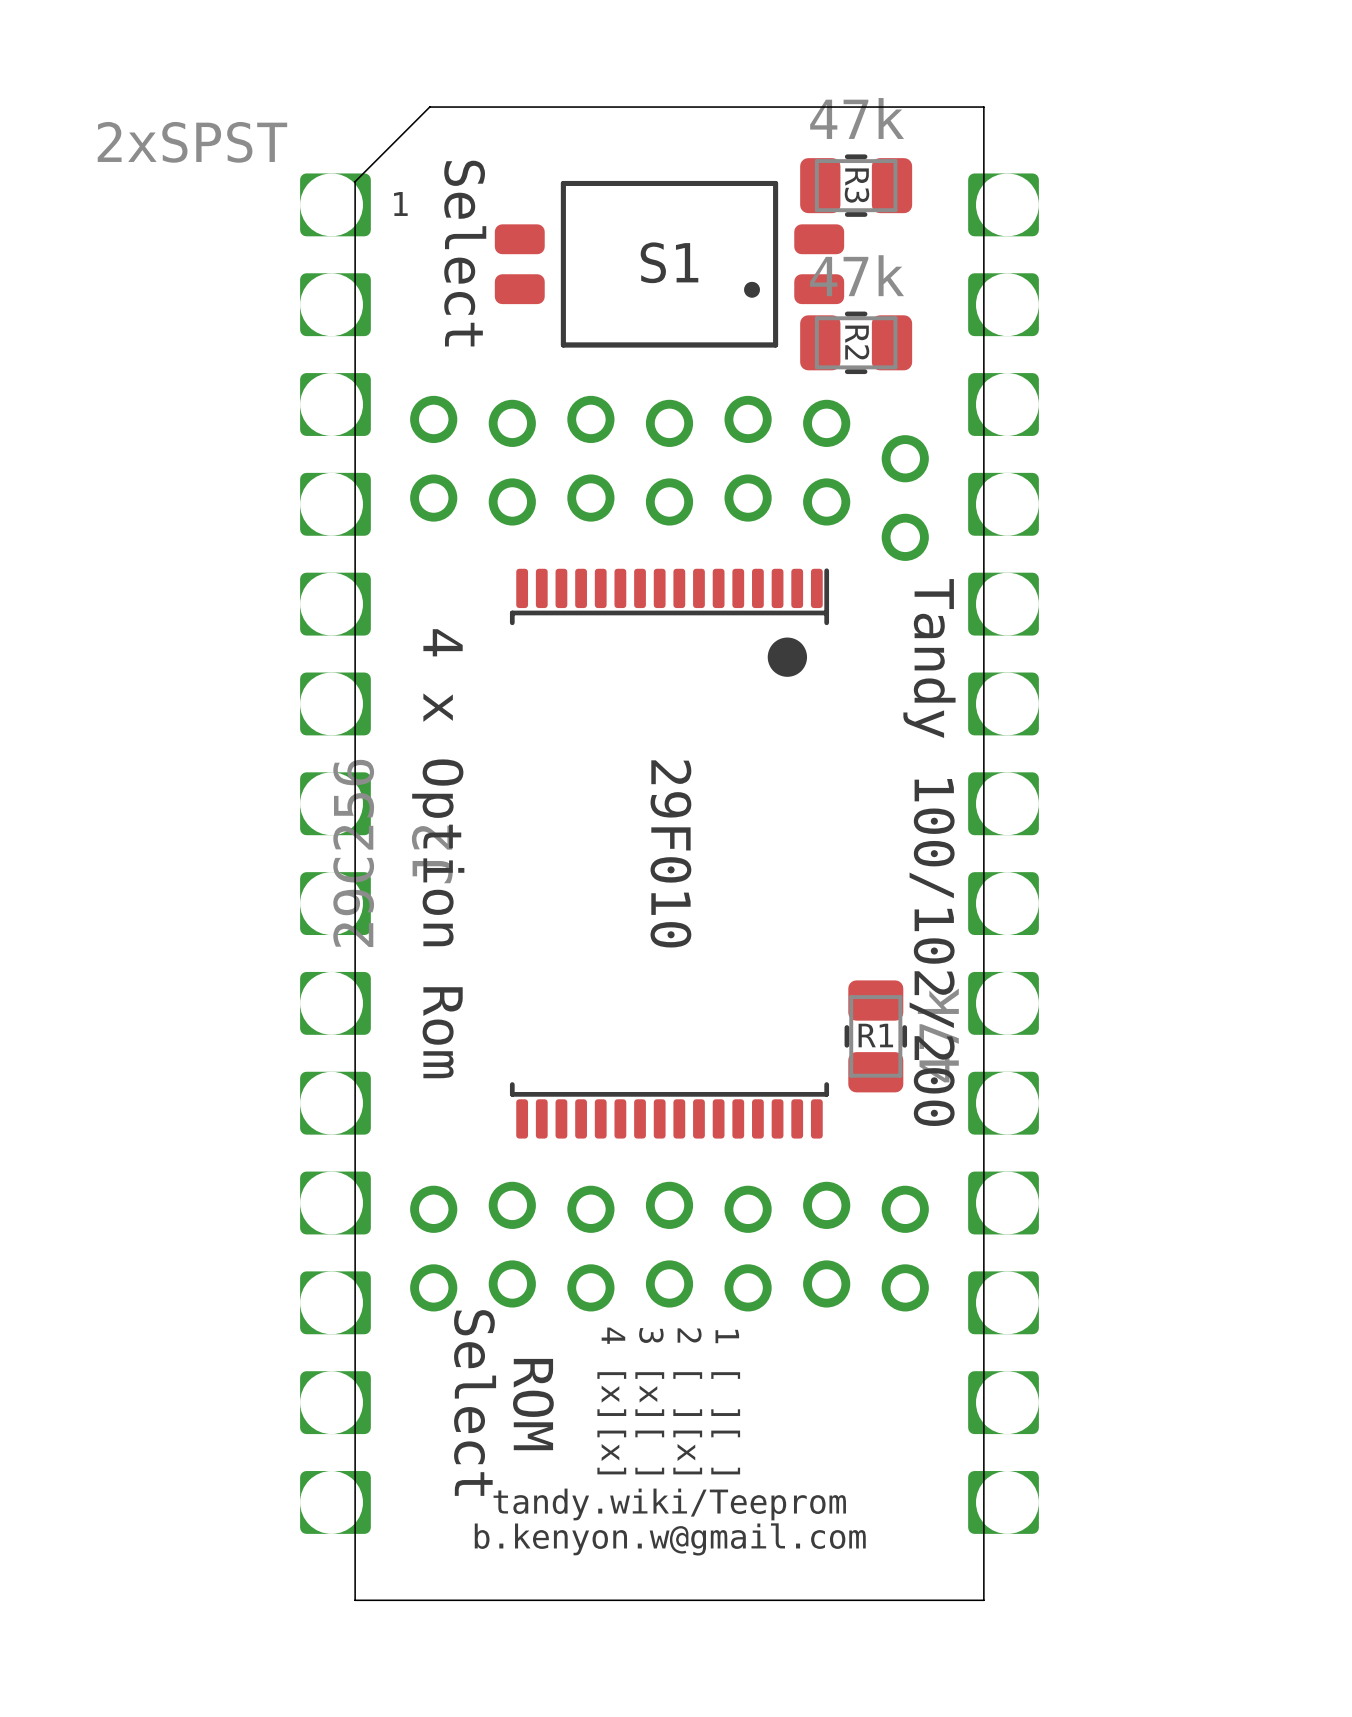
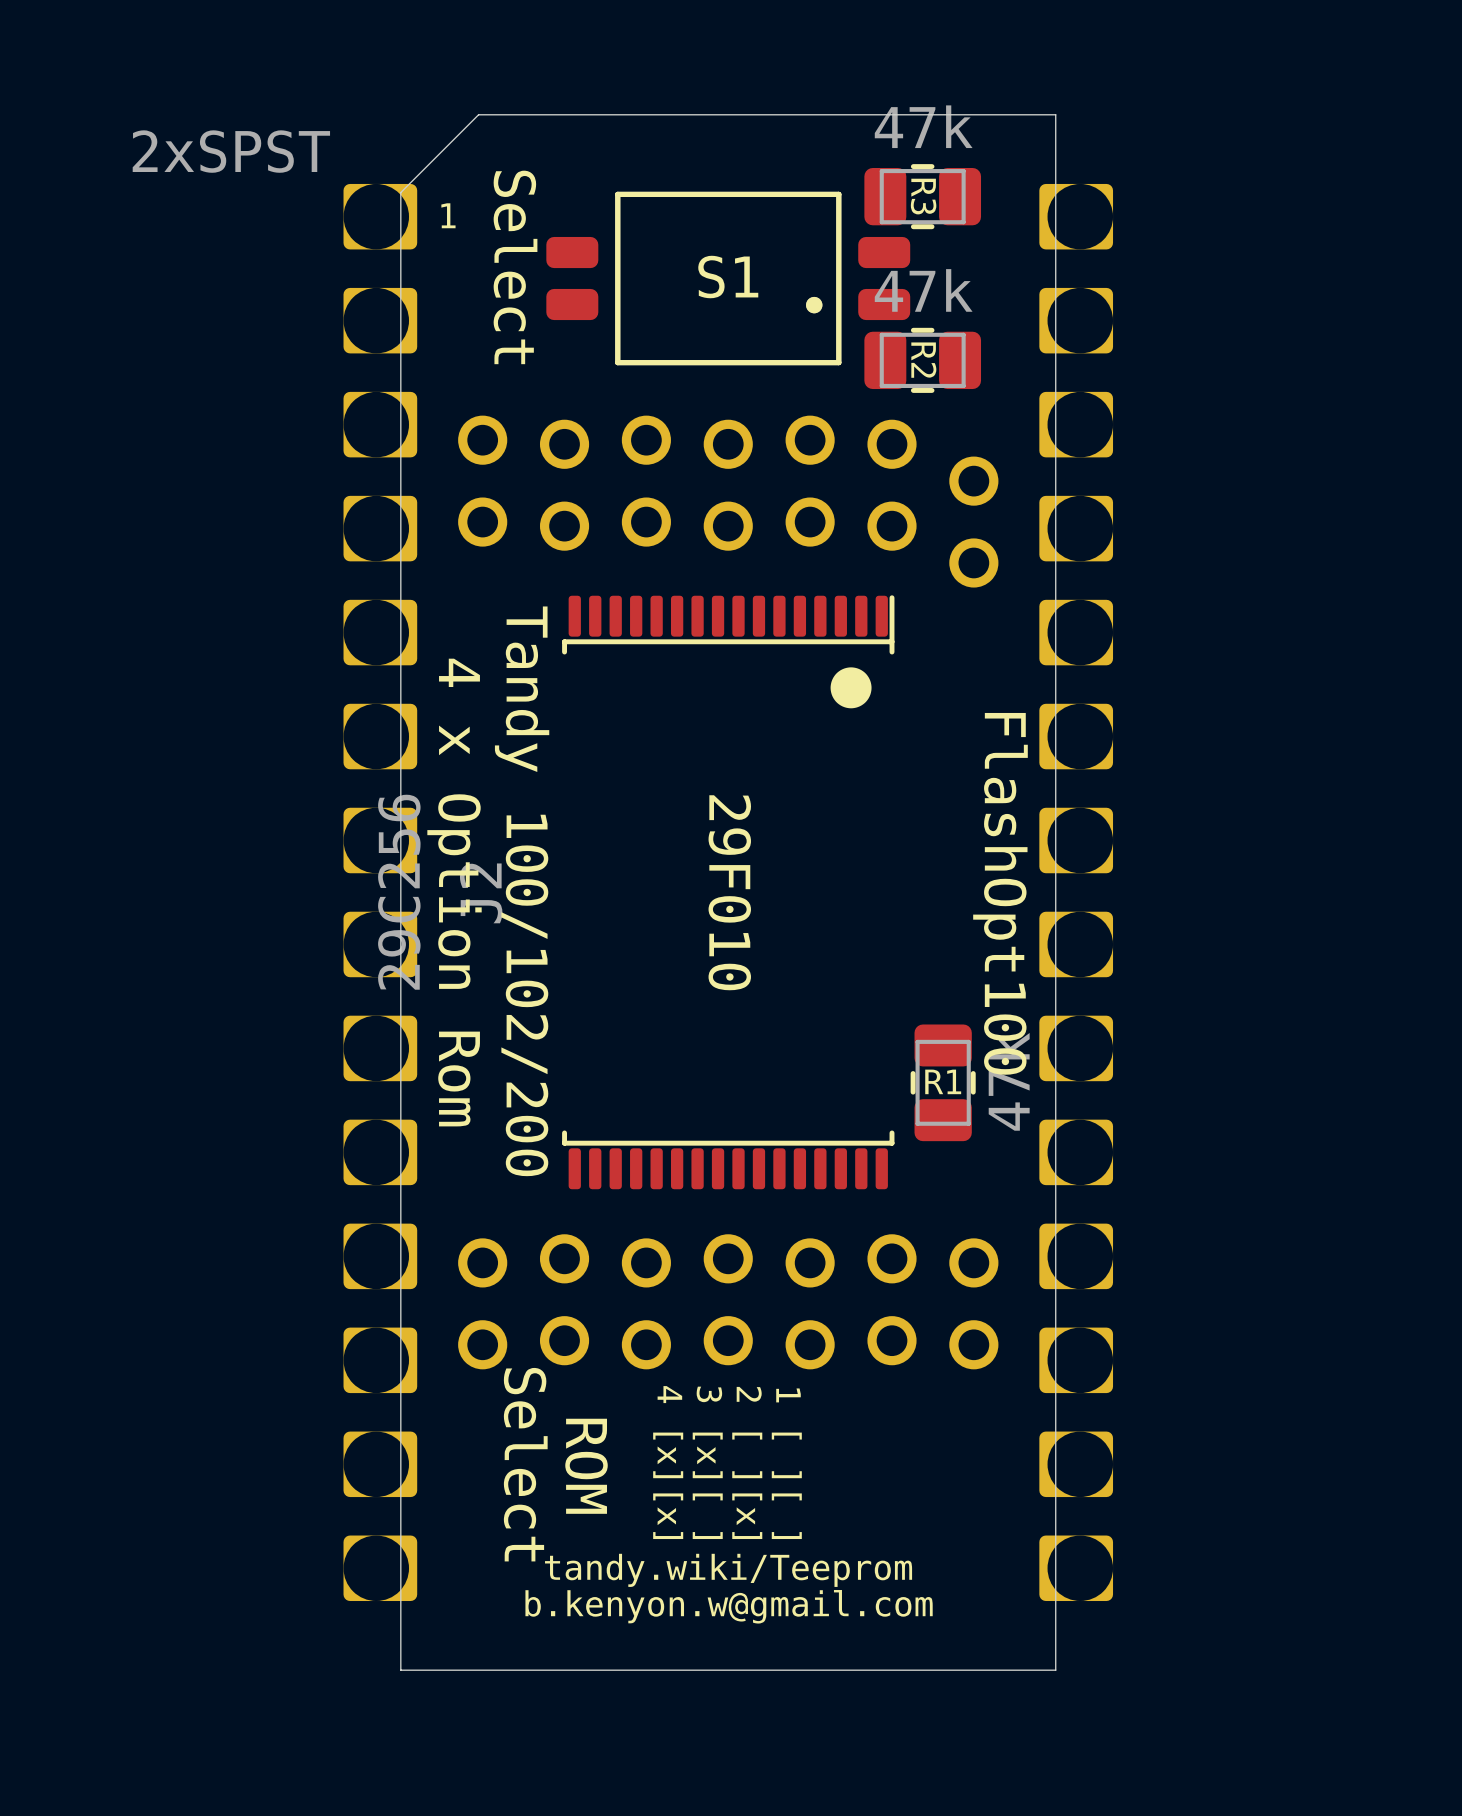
text: none -> Tandy 100/102/200 (522, 891)
text: Tandy 100/102/200 (929, 852) -> FlashOpt100 (1000, 893)
text position: 4 x Option Rom (438, 853) -> 4 x Option Rom (454, 892)

